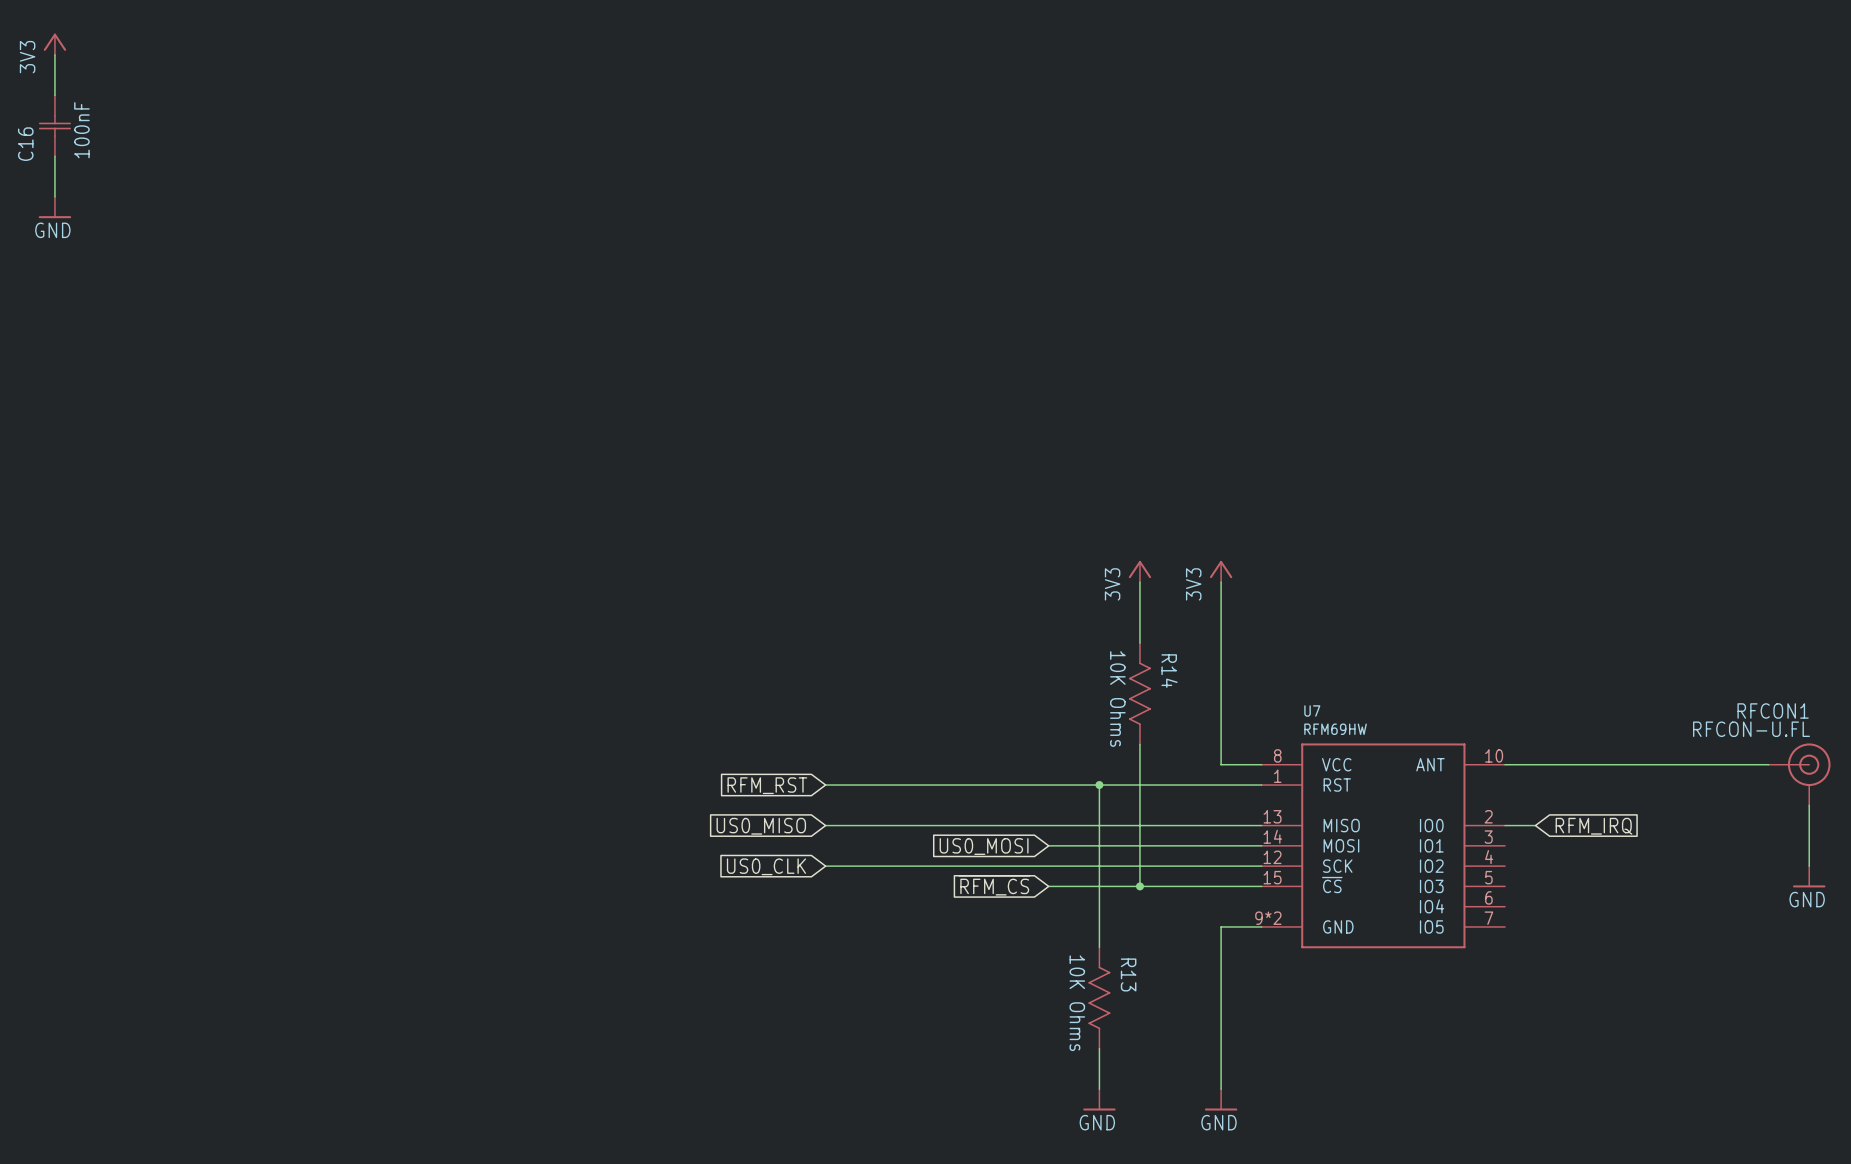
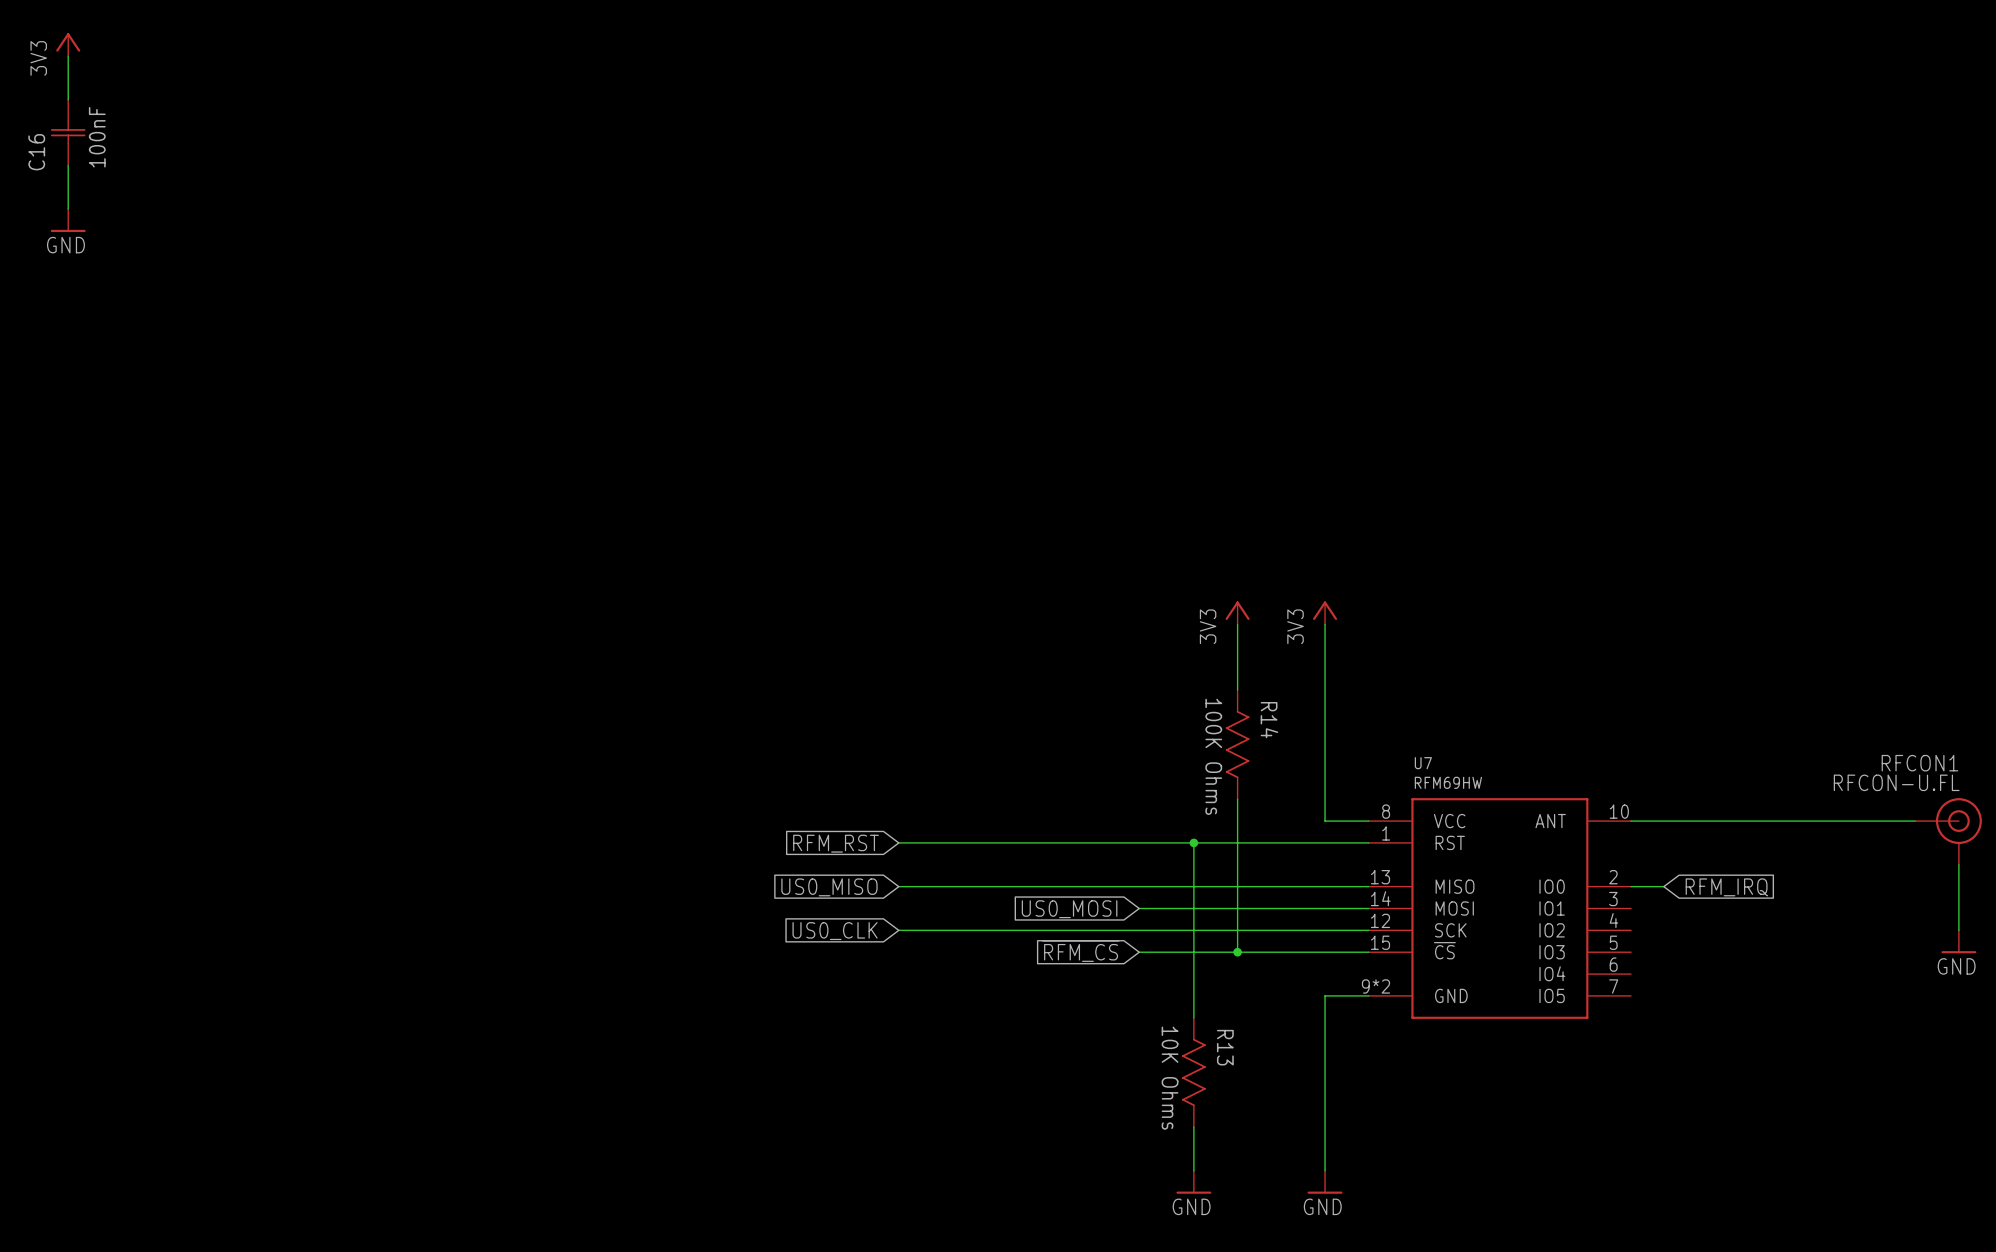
R14 value: 10K Ohms (1117, 699) -> 100K Ohms (1213, 756)

